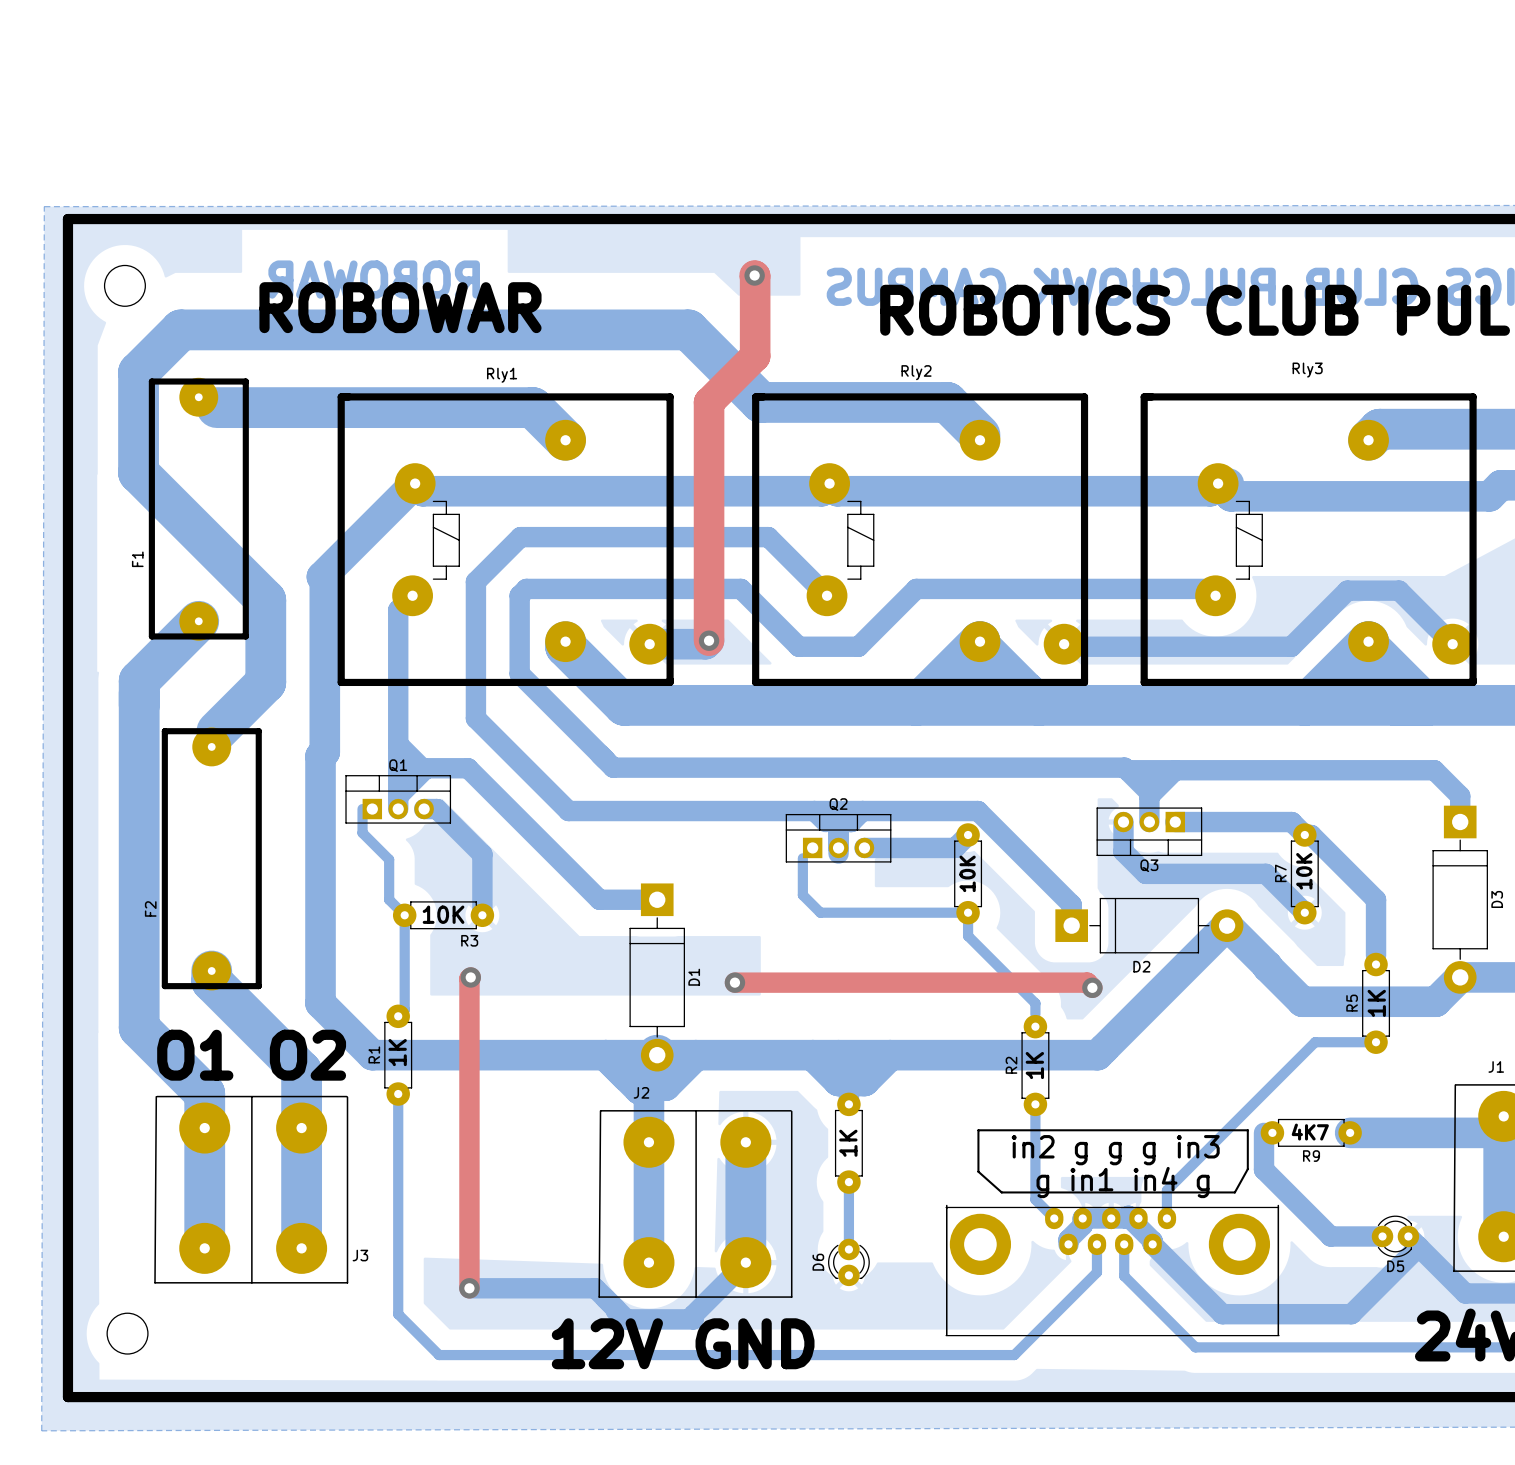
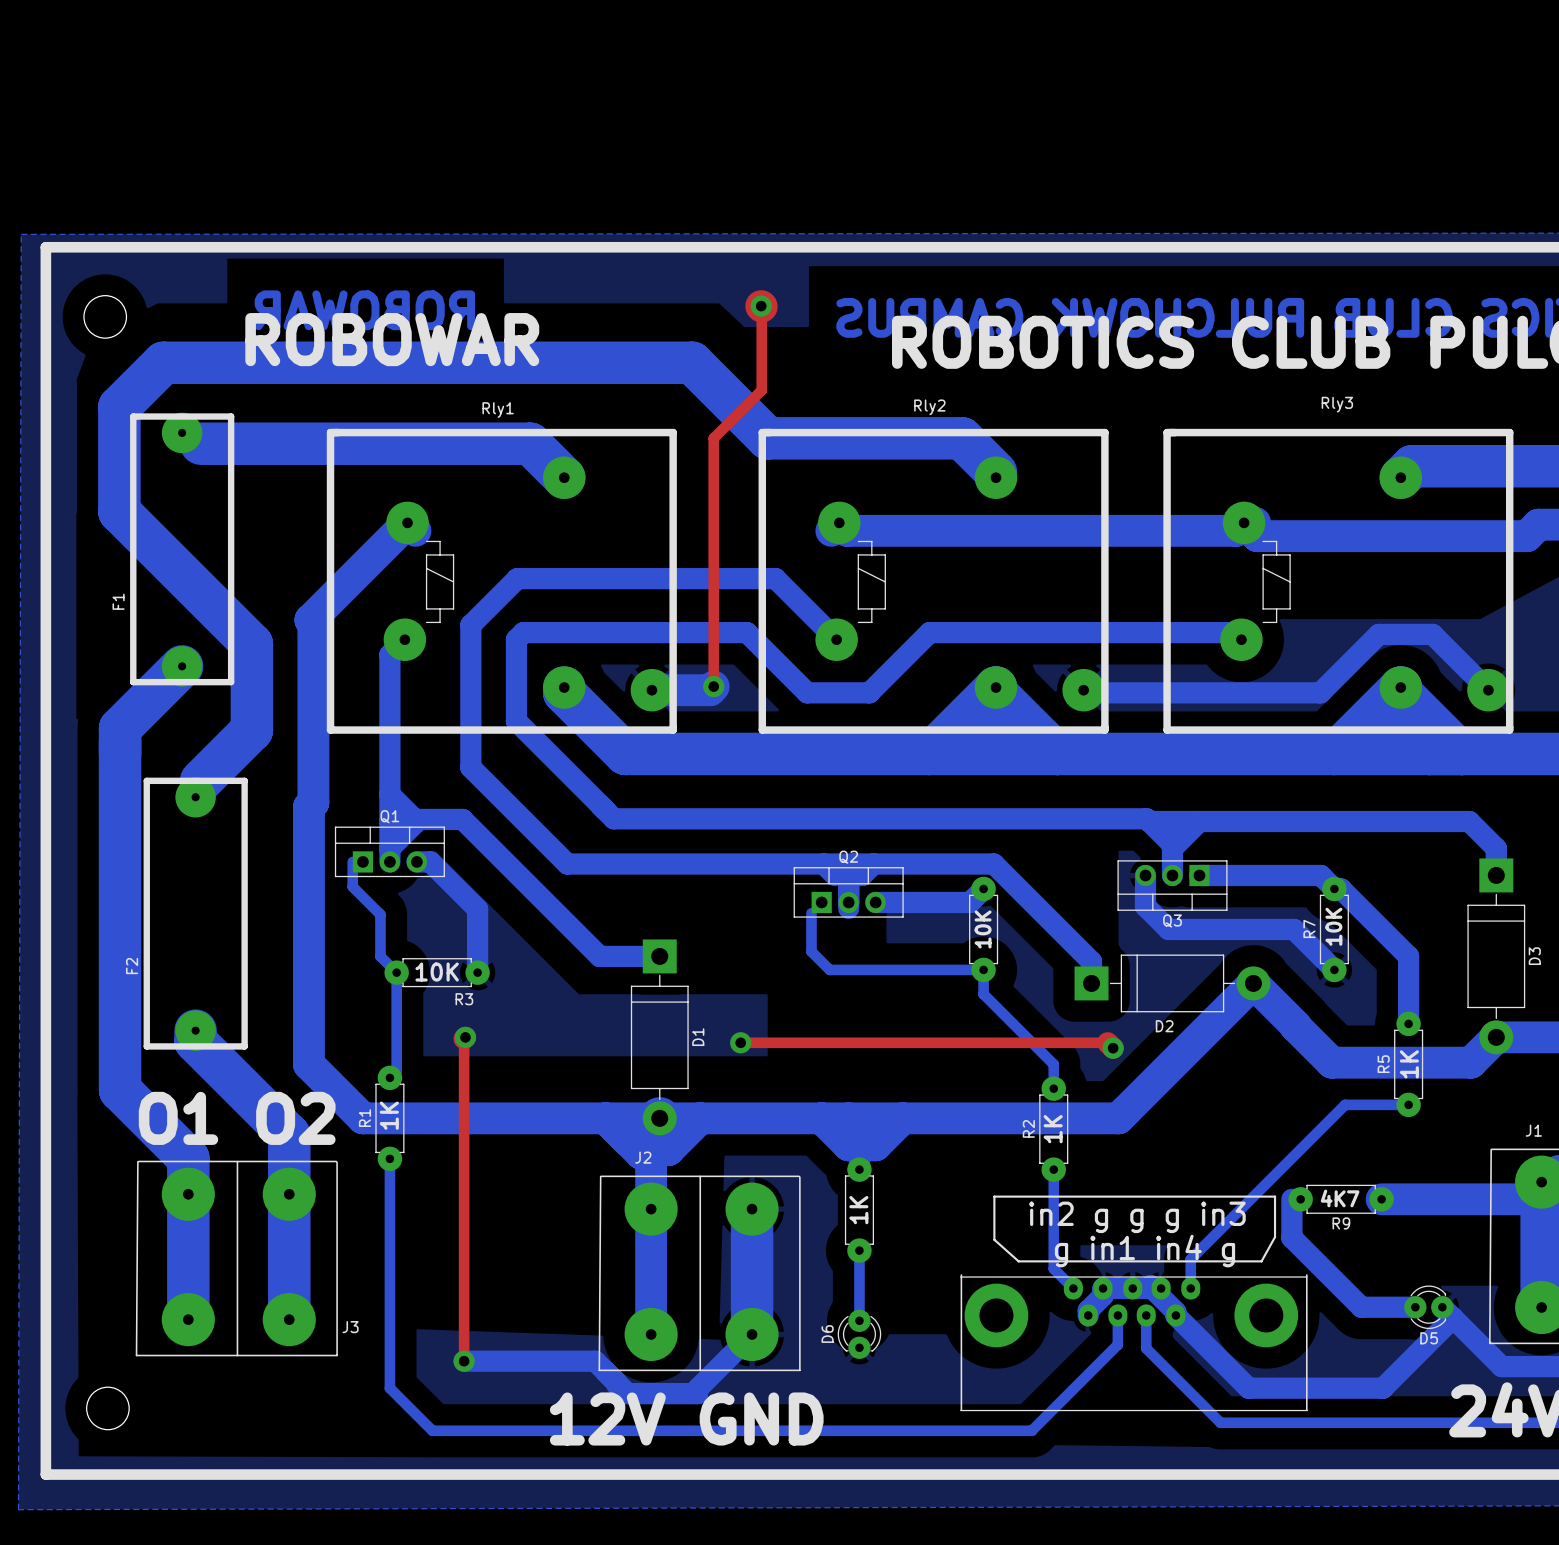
top track width: thick (755, 276) (755, 356) (709, 402) (709, 640) -> thin (761, 306) (761, 390) (713, 438) (713, 686)
bottom track: (422, 491) (821, 491) -> none
top track width: thick (469, 978) (469, 1288) -> thin (464, 1038) (464, 1361)
top track width: thick (734, 982) (1087, 982) -> thin (740, 1042) (1107, 1042)

